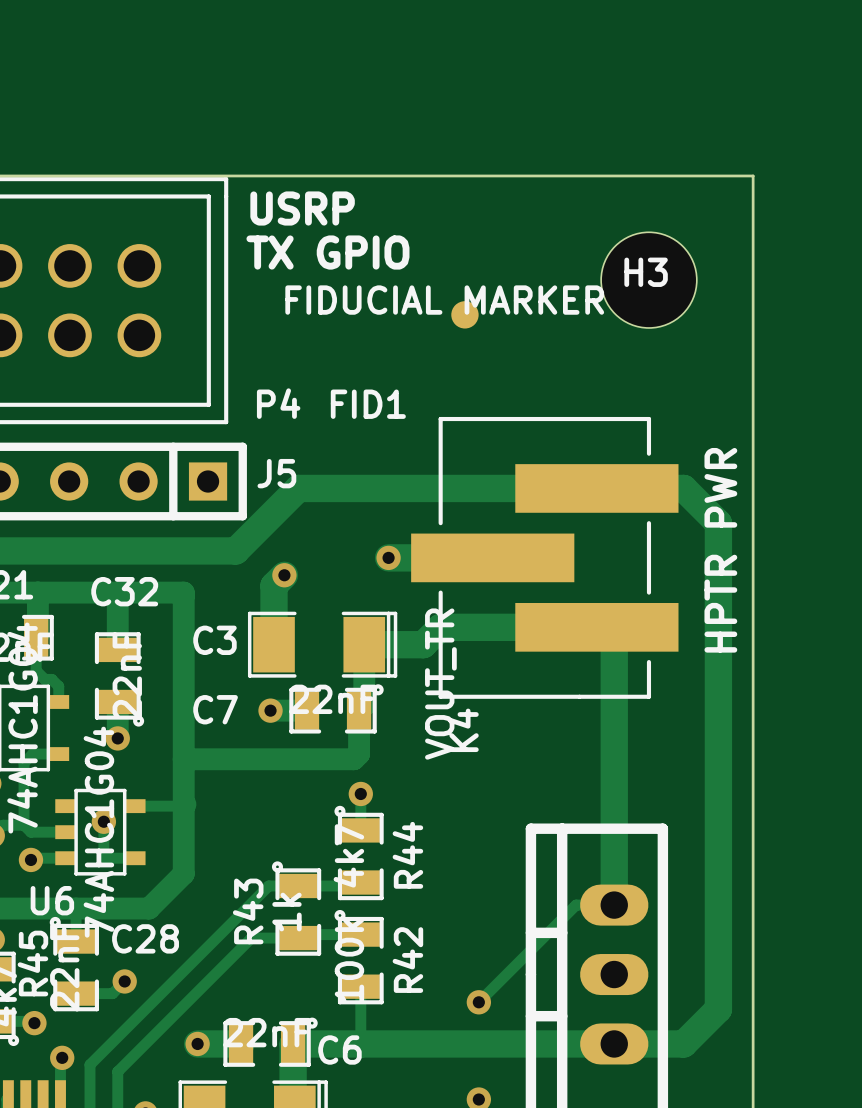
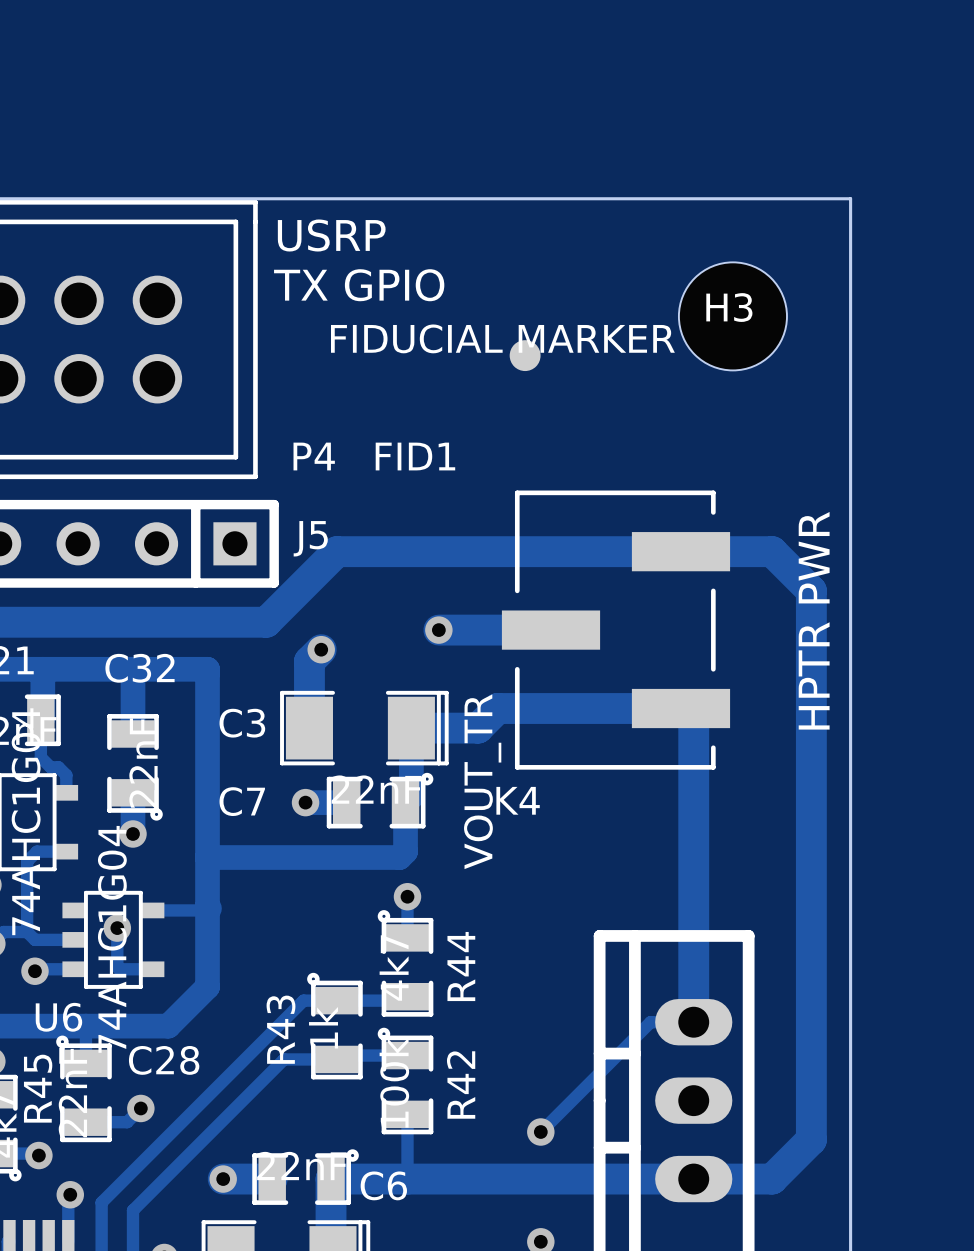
K4 footprint: [411, 416, 679, 699] -> [501, 490, 731, 770]

